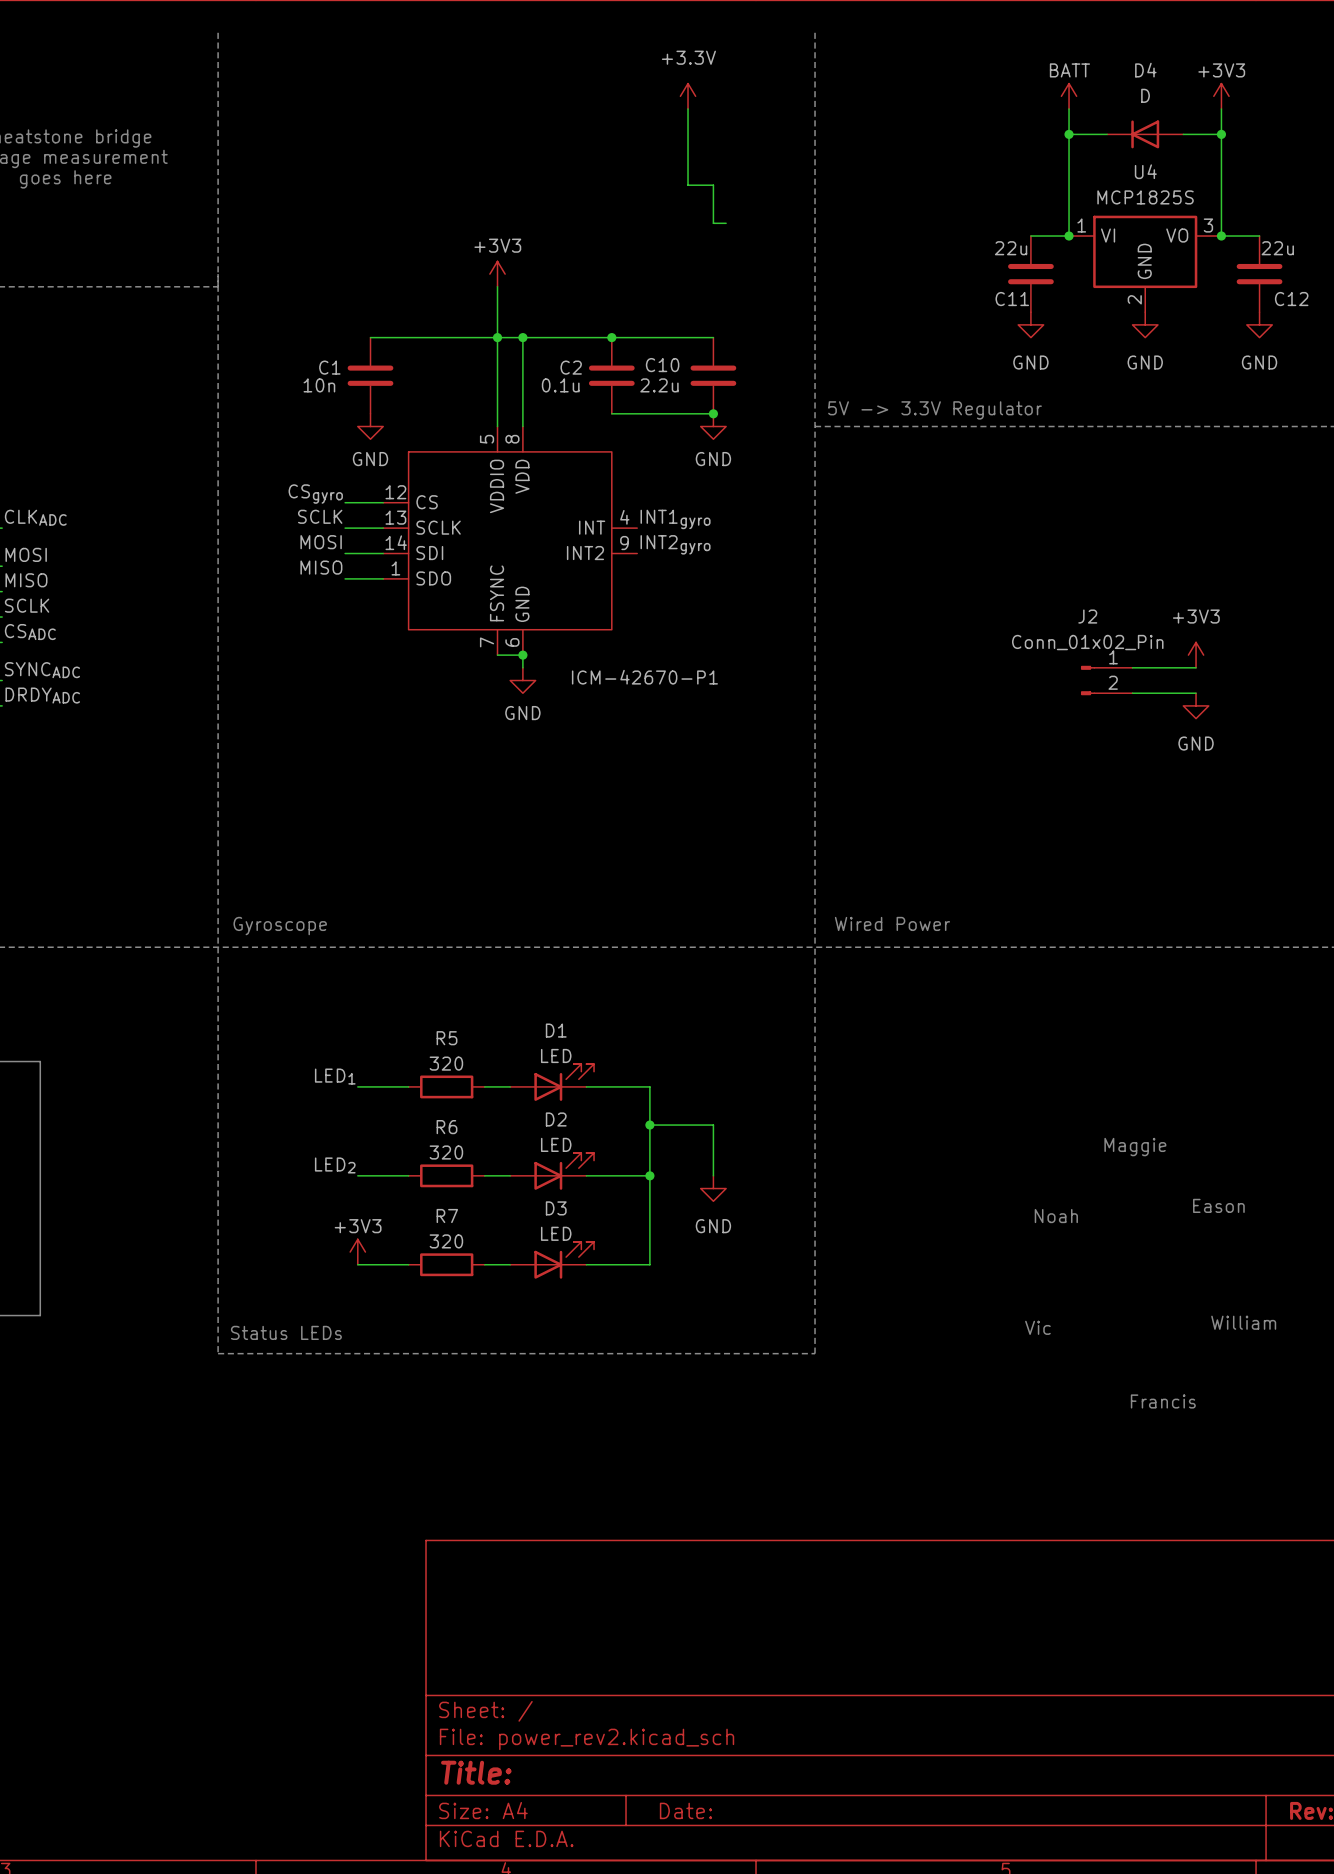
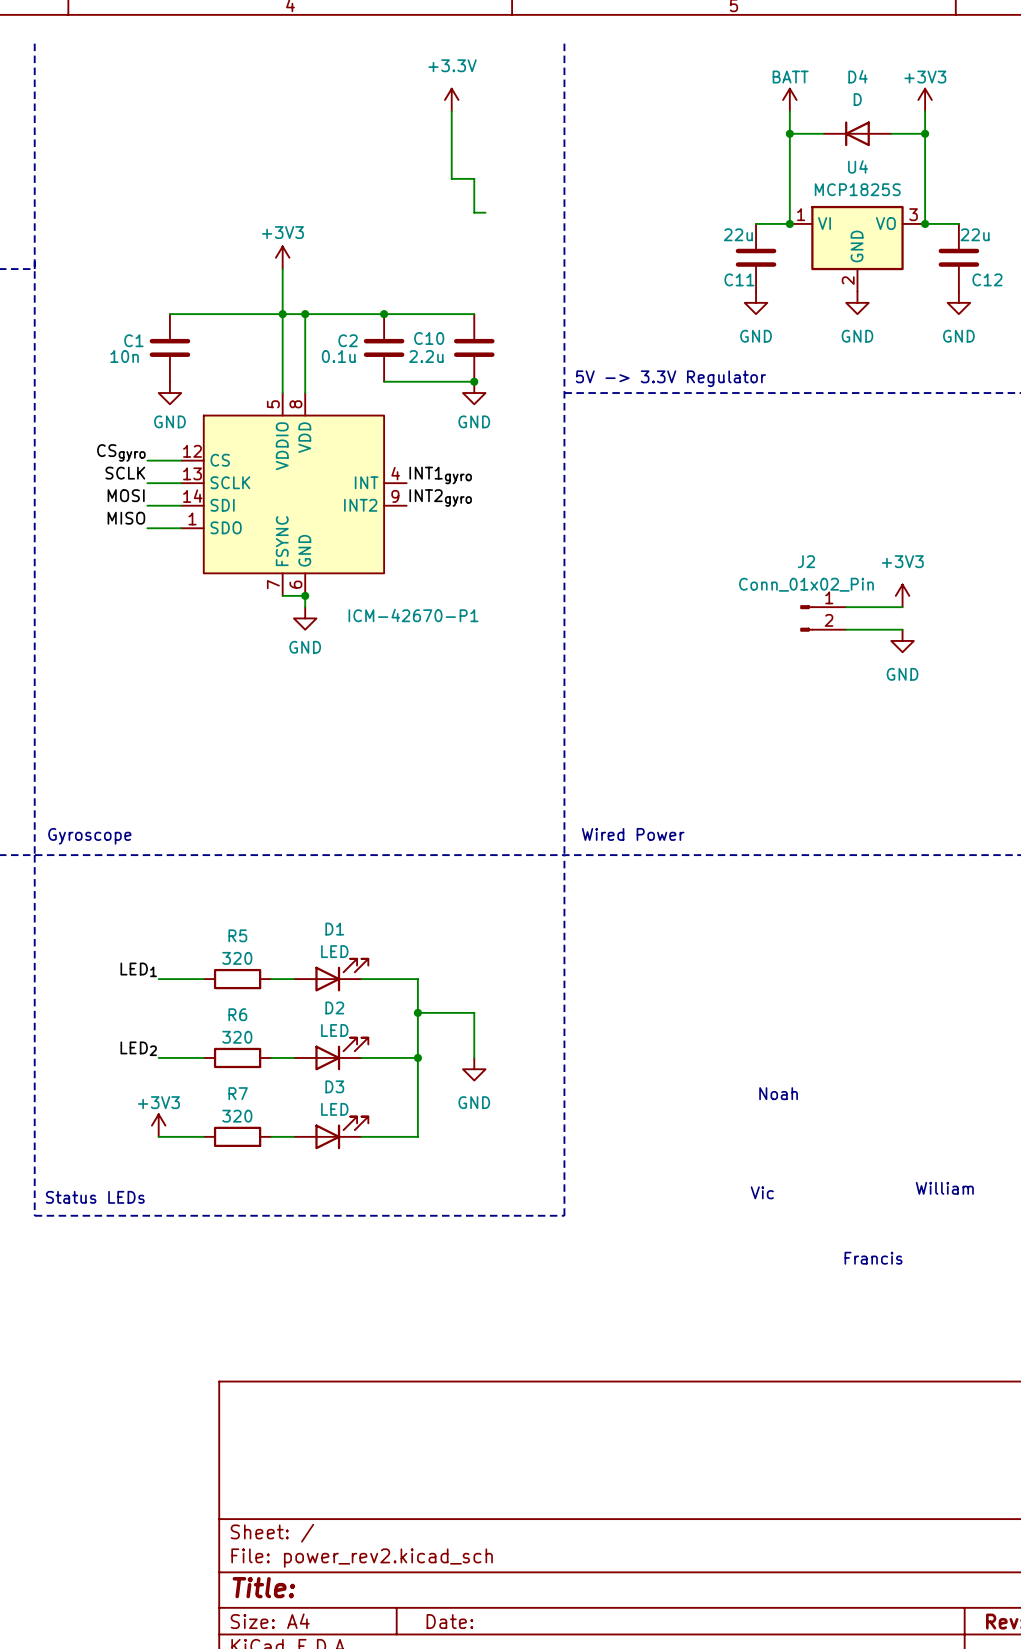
text: Maggie (1135, 1147) -> none
text: Eason (1218, 1205) -> none

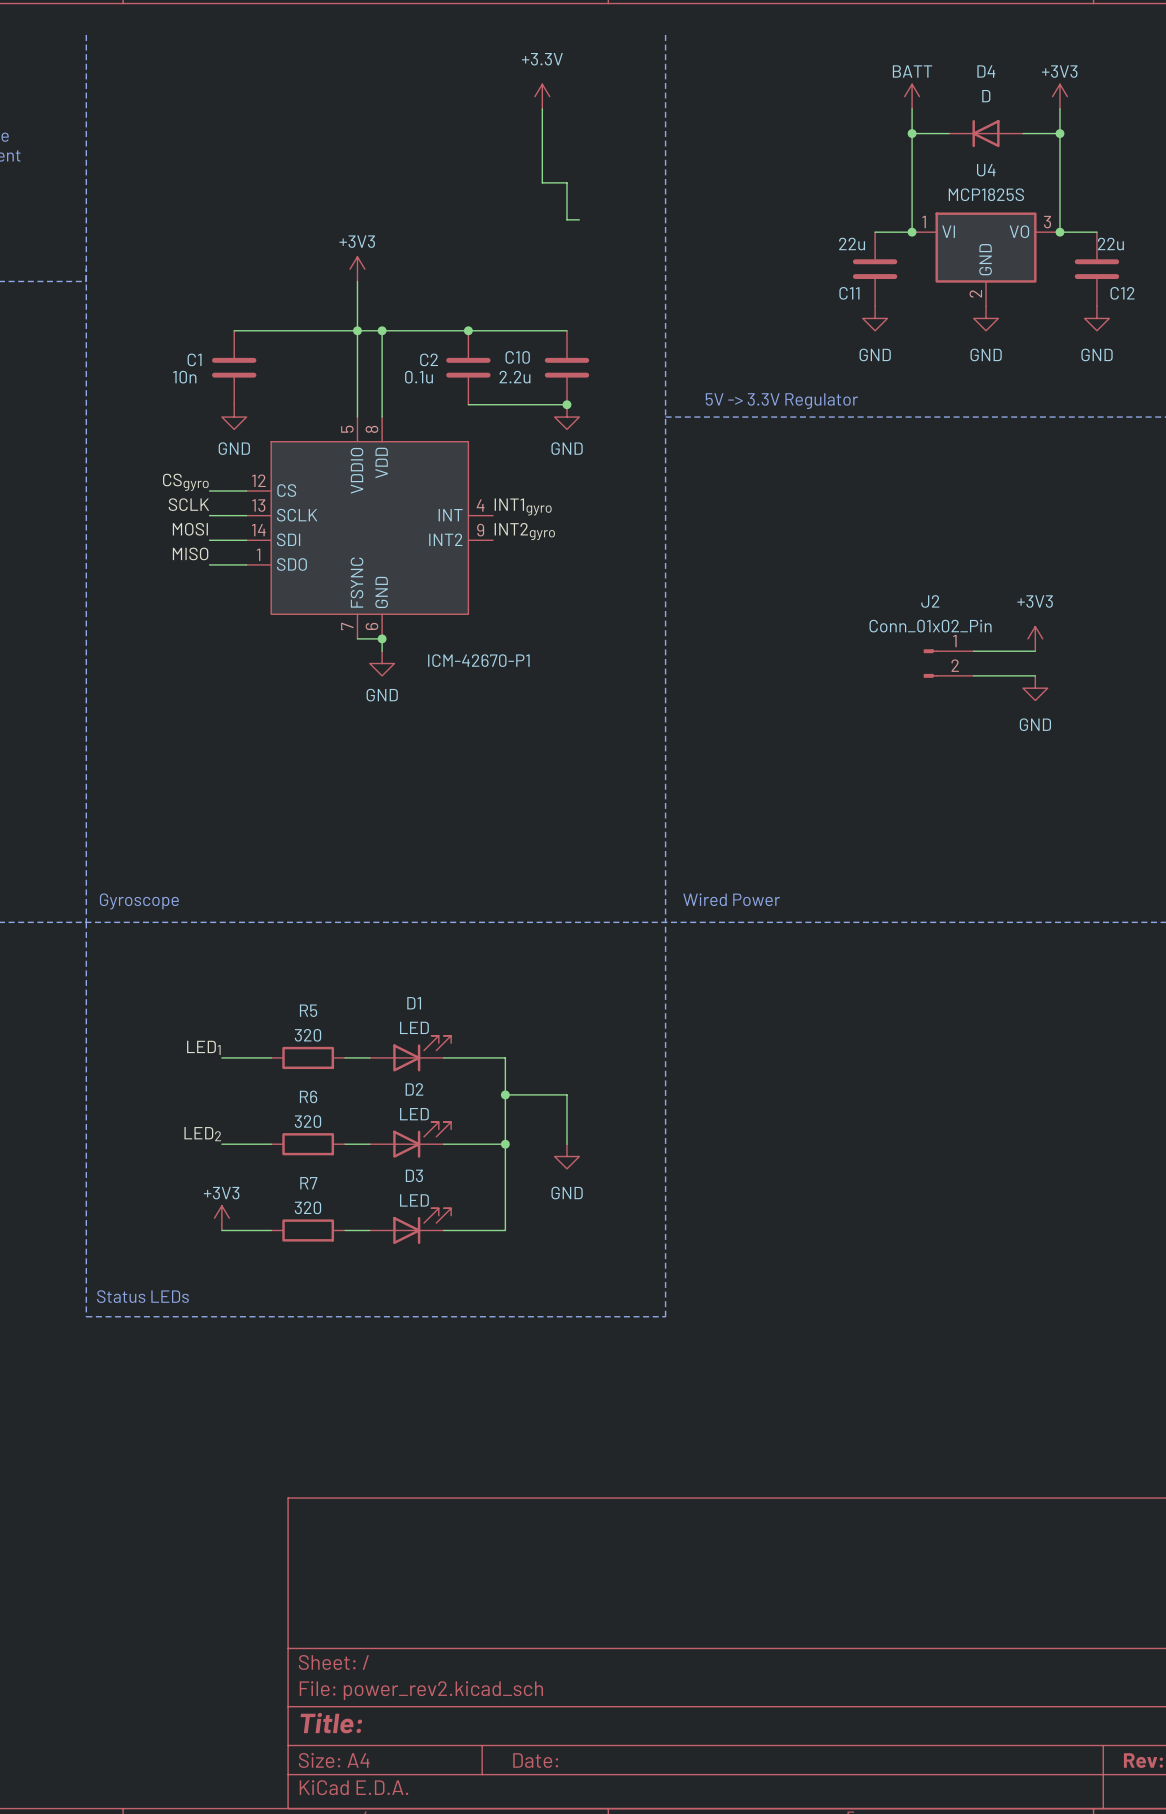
text: Noah (778, 1093) -> none
text: William (944, 1188) -> none
text: Vic (762, 1192) -> none
text: Francis (873, 1258) -> none

